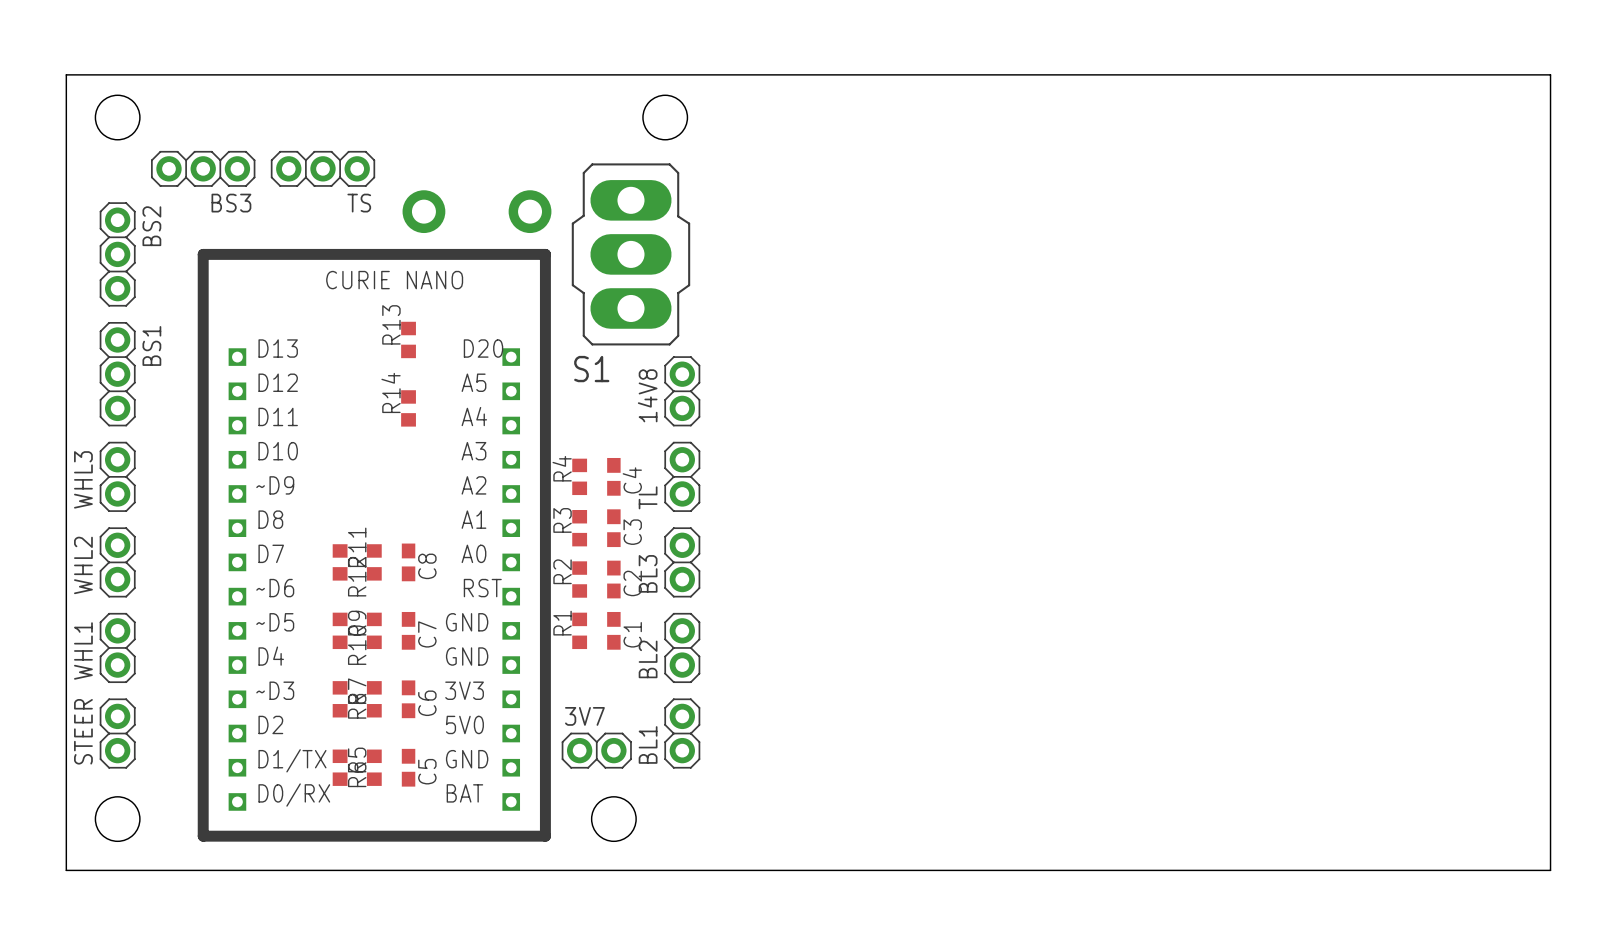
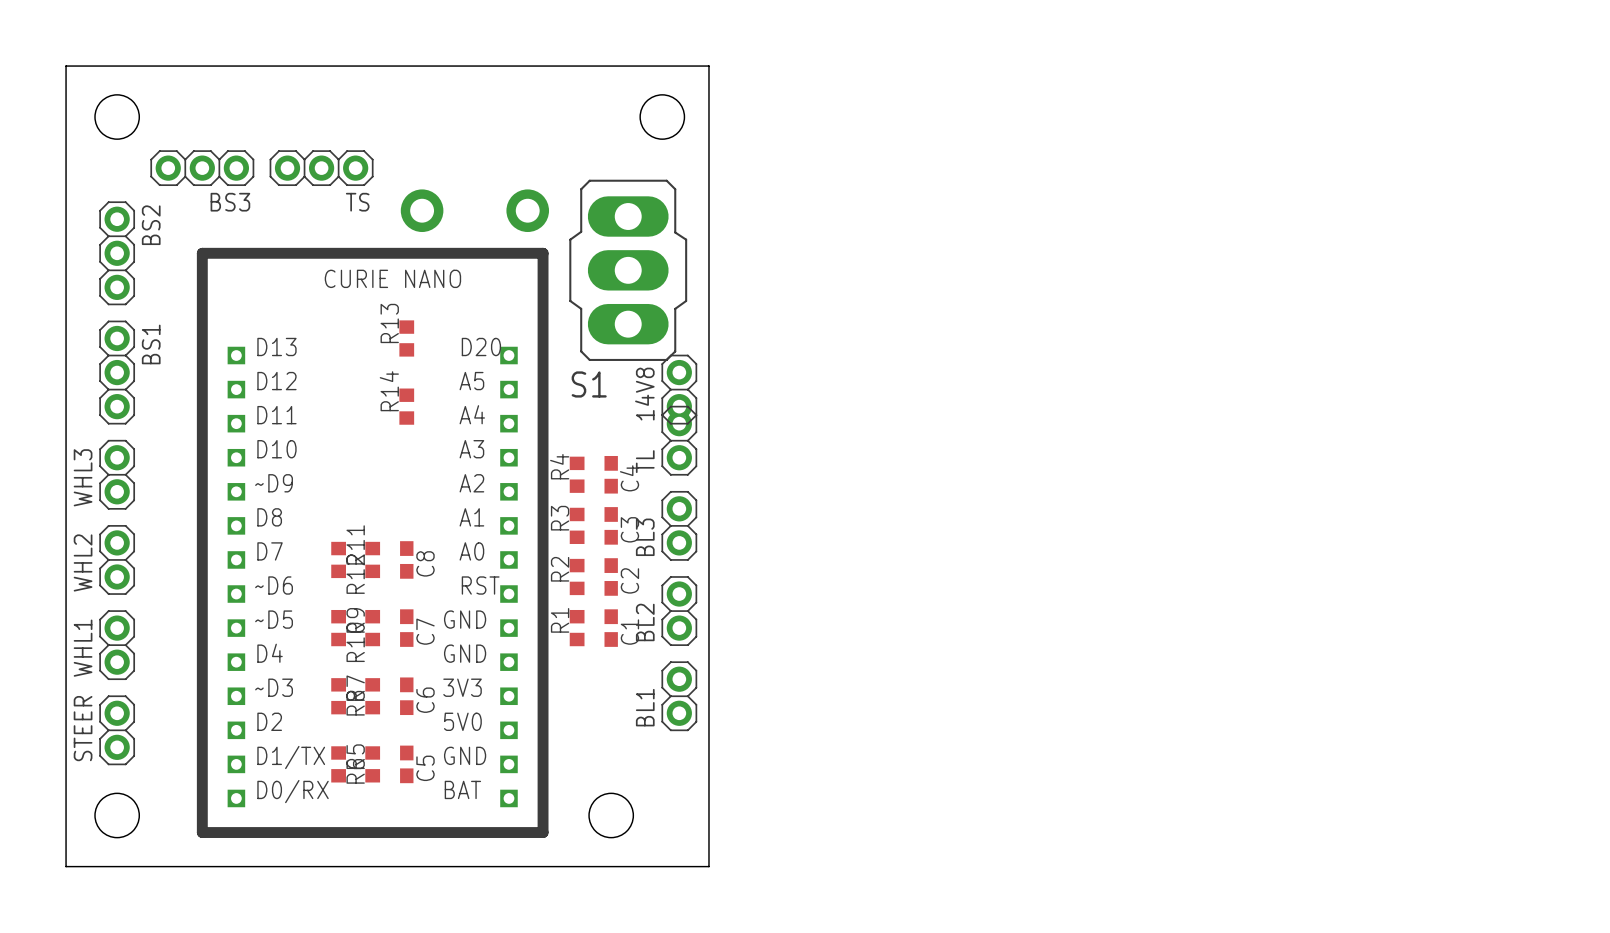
board edge: (66, 74) (1550, 74) (1550, 870) (712, 870) -> (66, 74) (66, 66) (708, 66) (708, 866)
S1 position: (630, 254) -> (628, 270)
TL position: (682, 476) -> (679, 440)
BL3 position: (682, 562) -> (679, 525)
BL2 position: (682, 647) -> (679, 611)
BL1 position: (682, 733) -> (679, 696)
3V7: (596, 750) -> none

